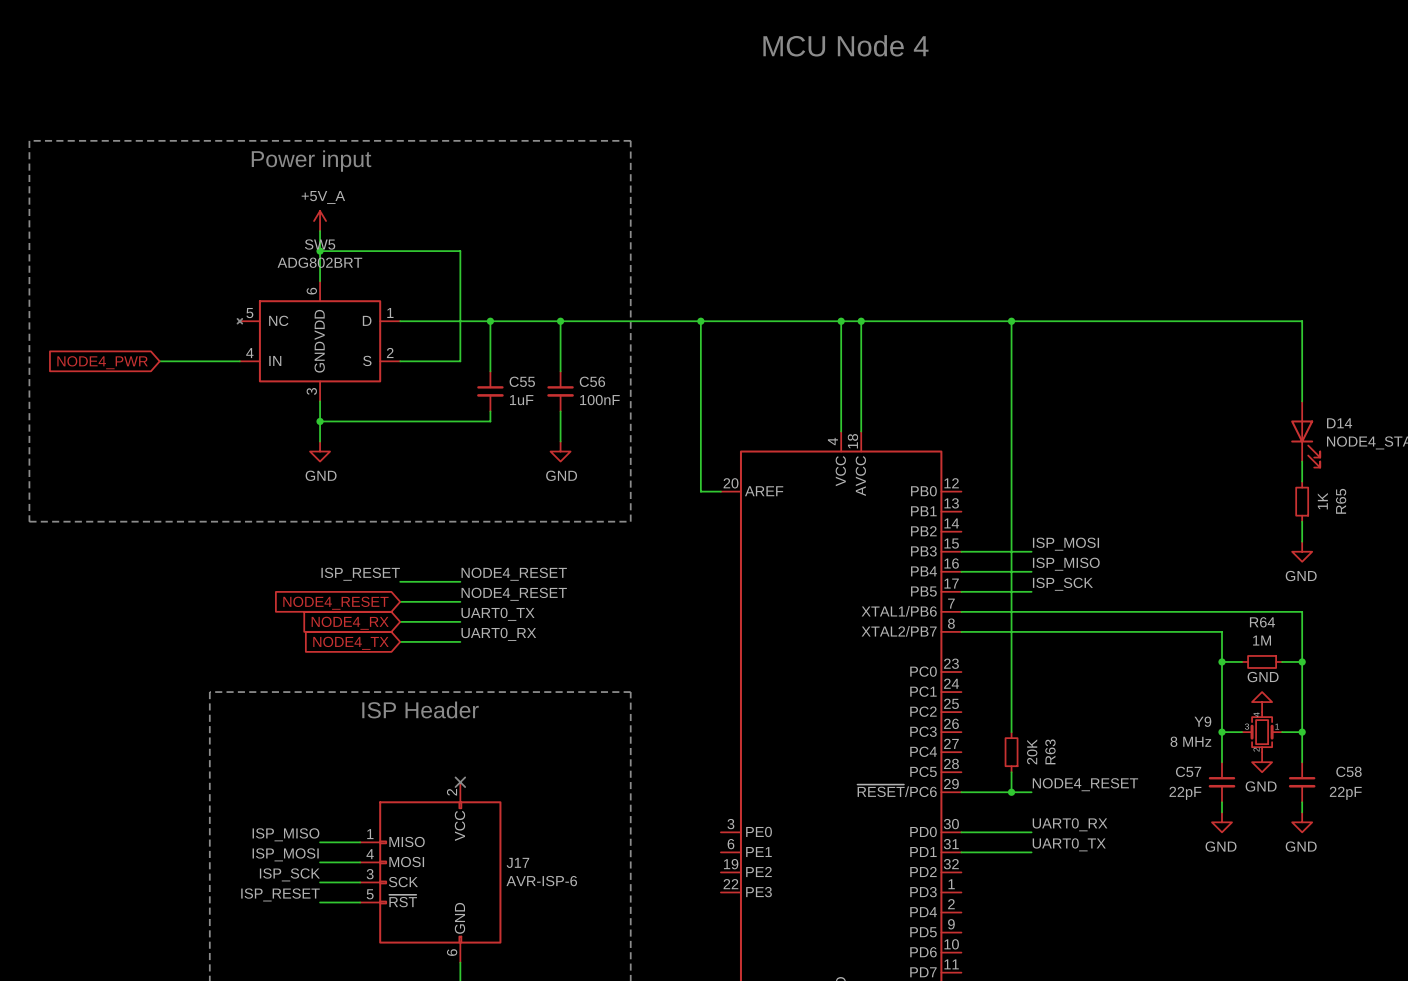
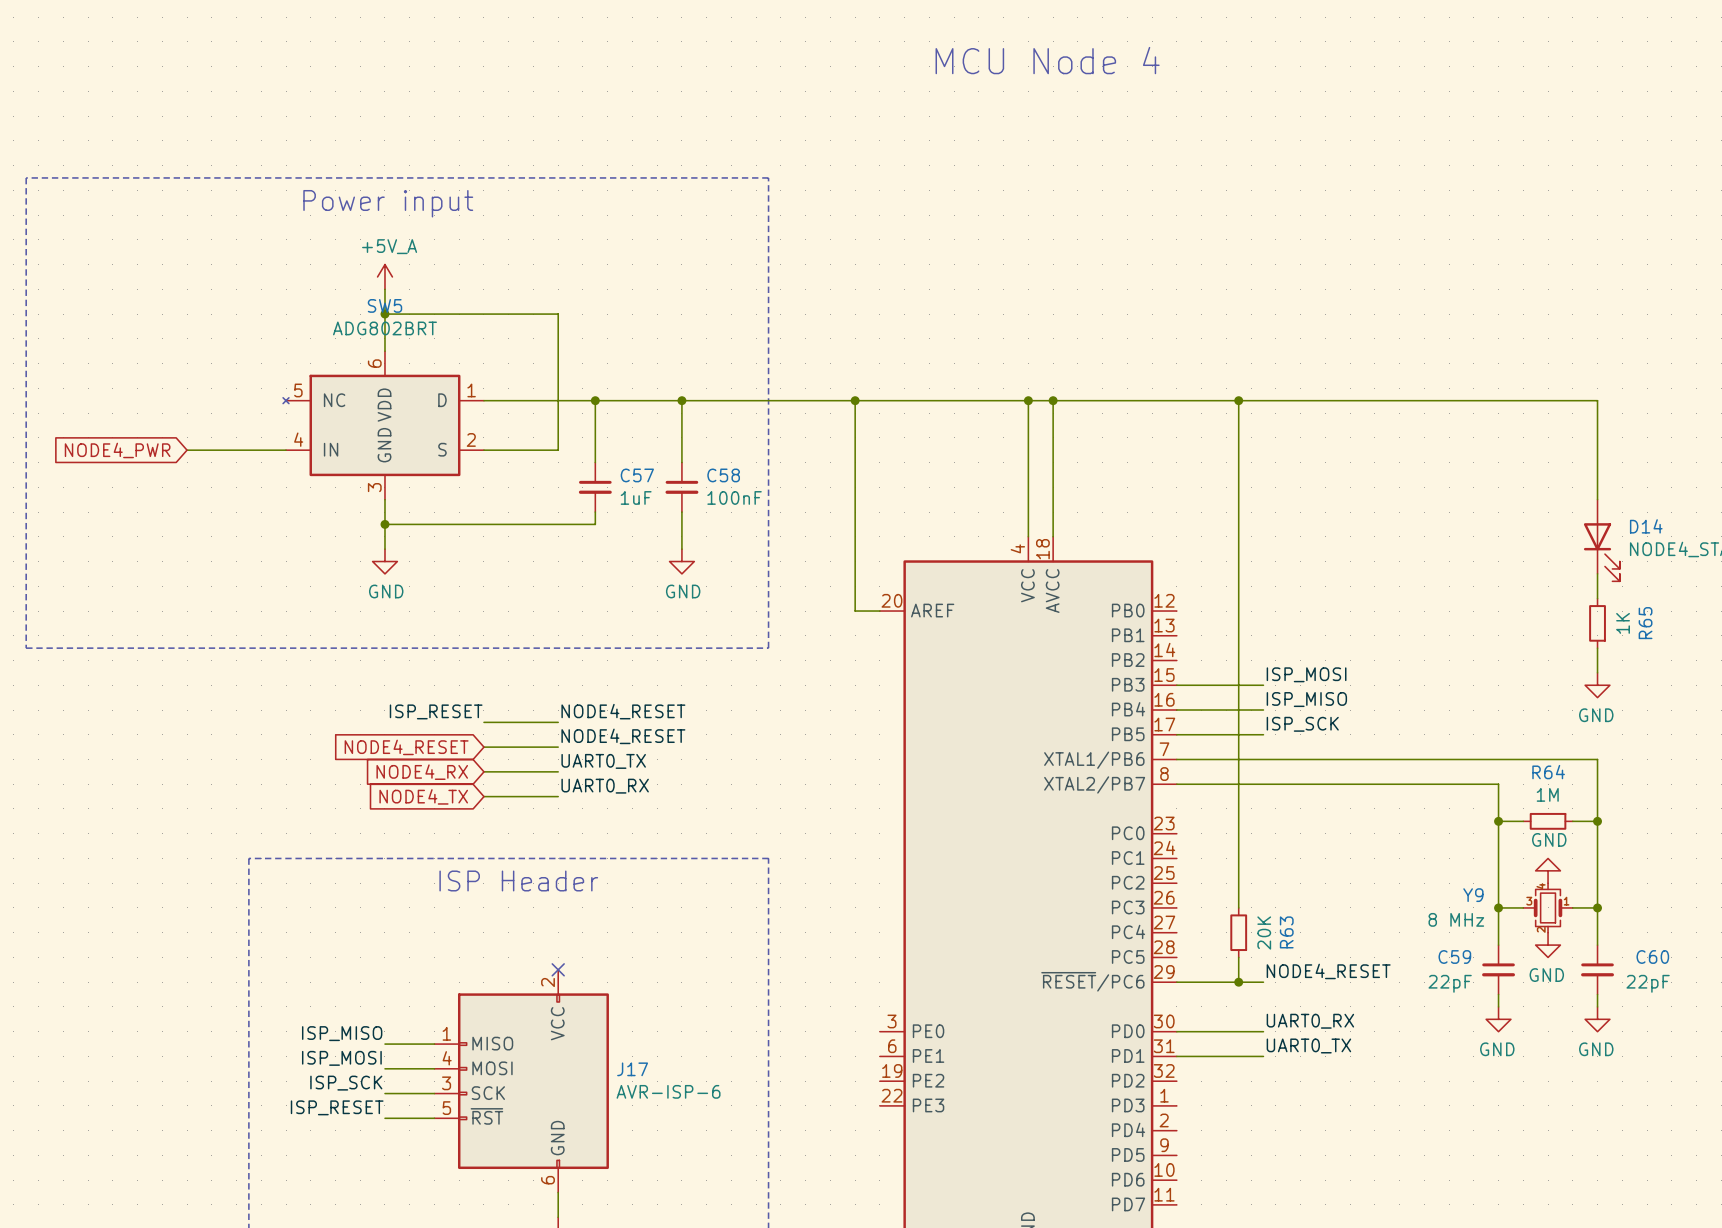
C55 name: C55 (522, 381) -> C57 (637, 475)
C56 name: C56 (592, 381) -> C58 (723, 475)
C57 name: C57 (1188, 771) -> C59 (1454, 956)
C58 name: C58 (1348, 771) -> C60 (1652, 956)

